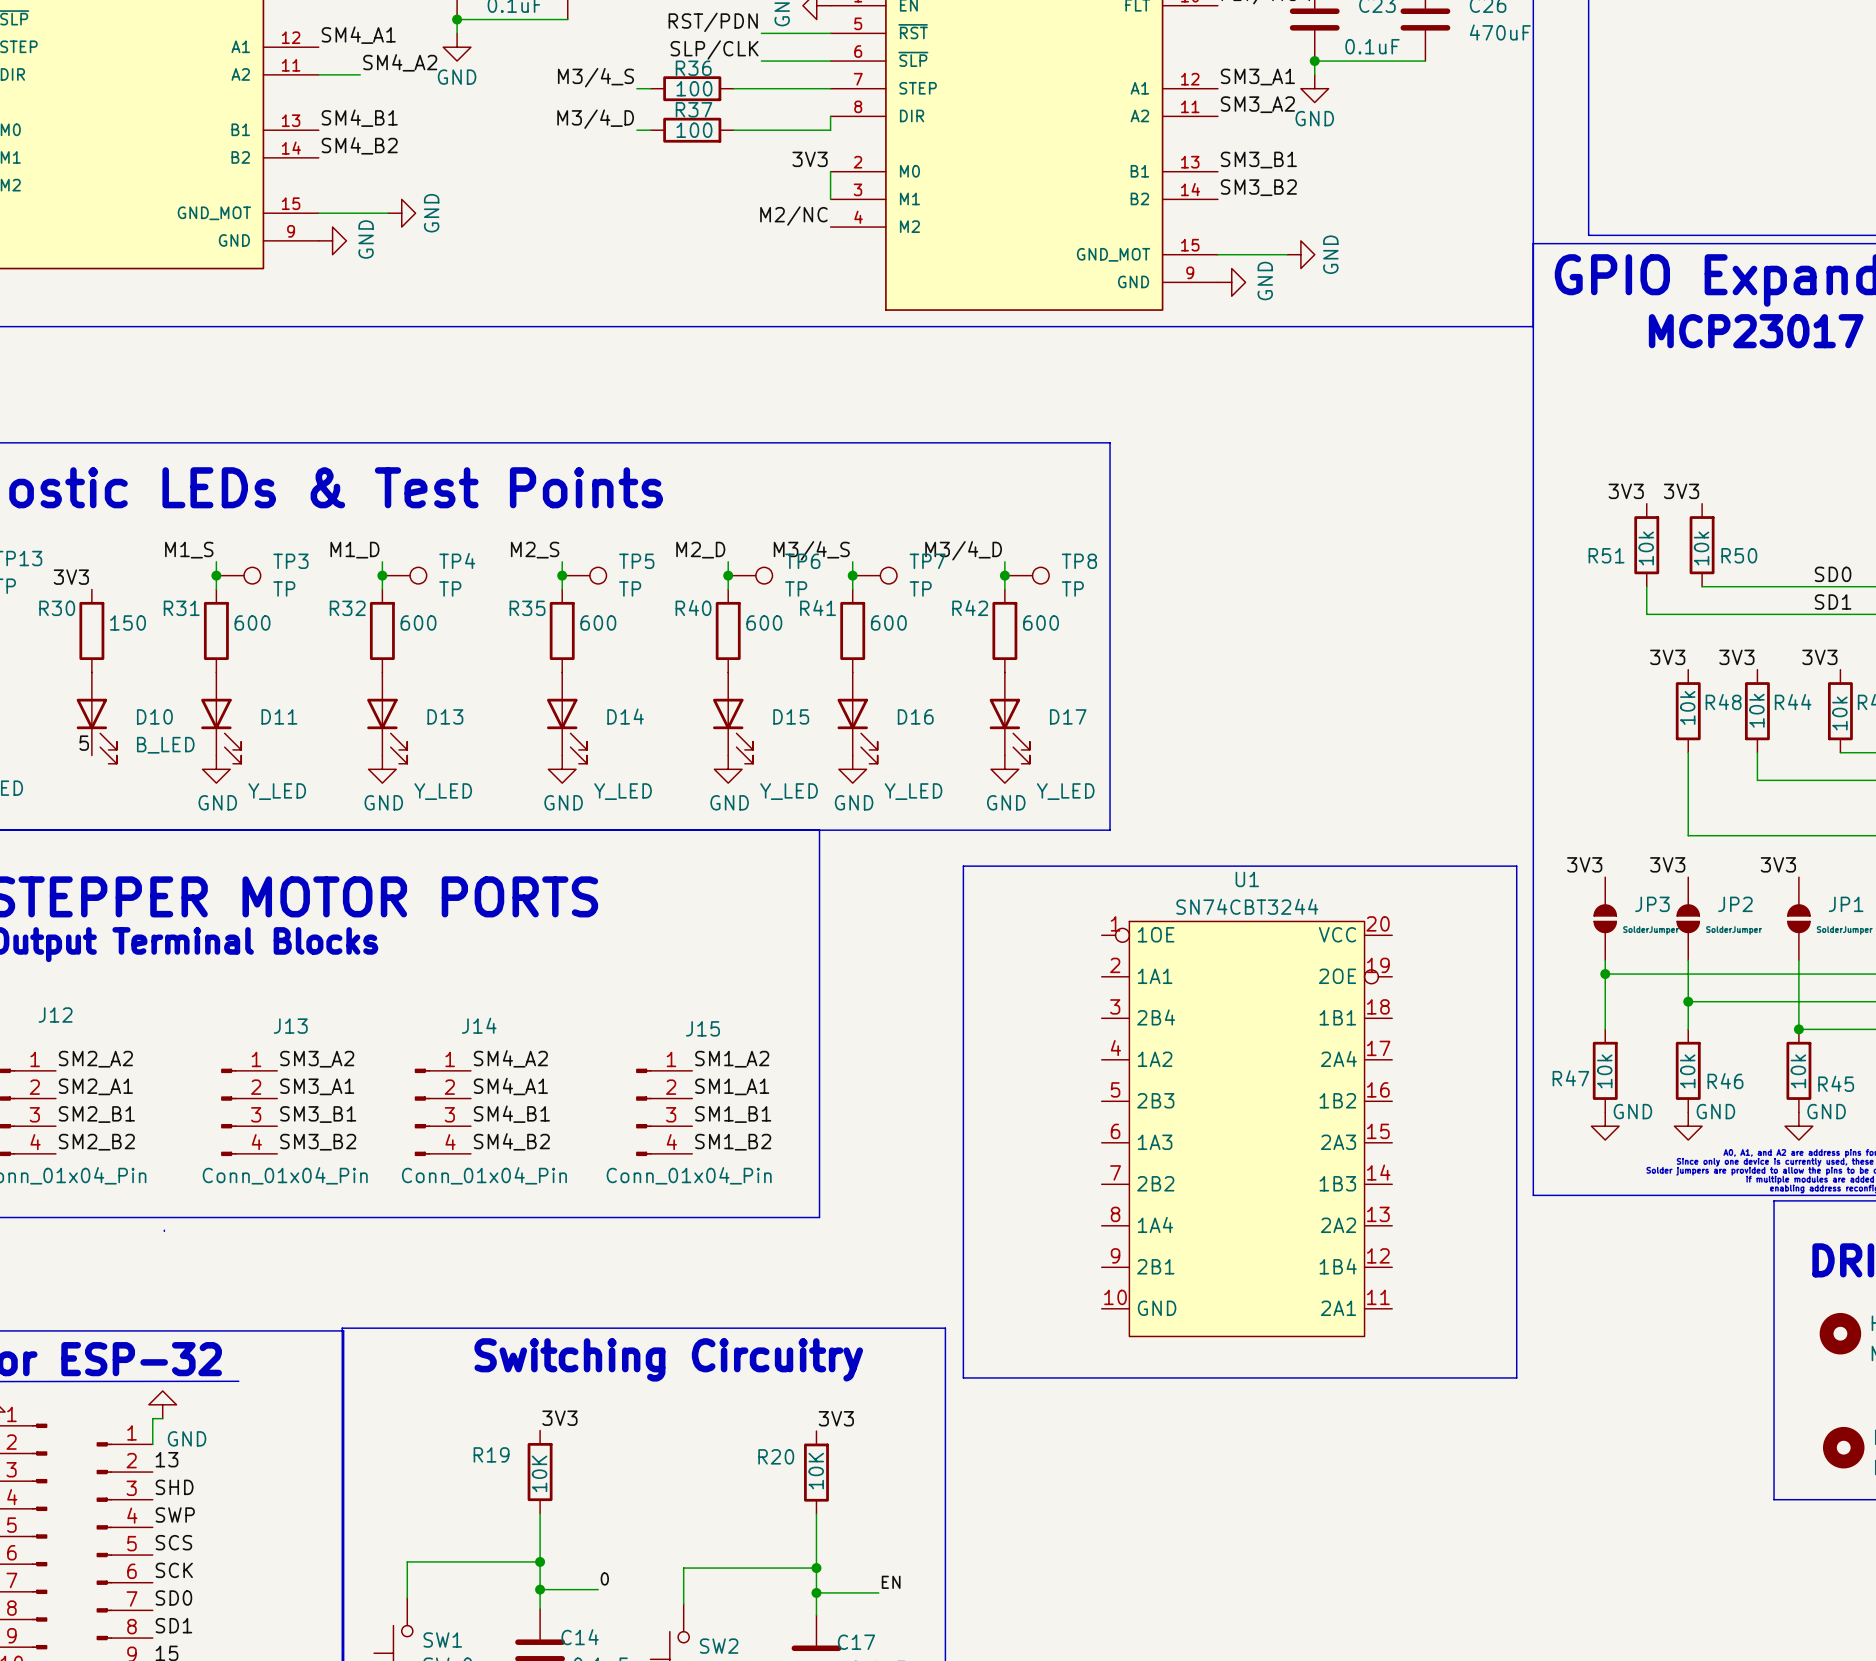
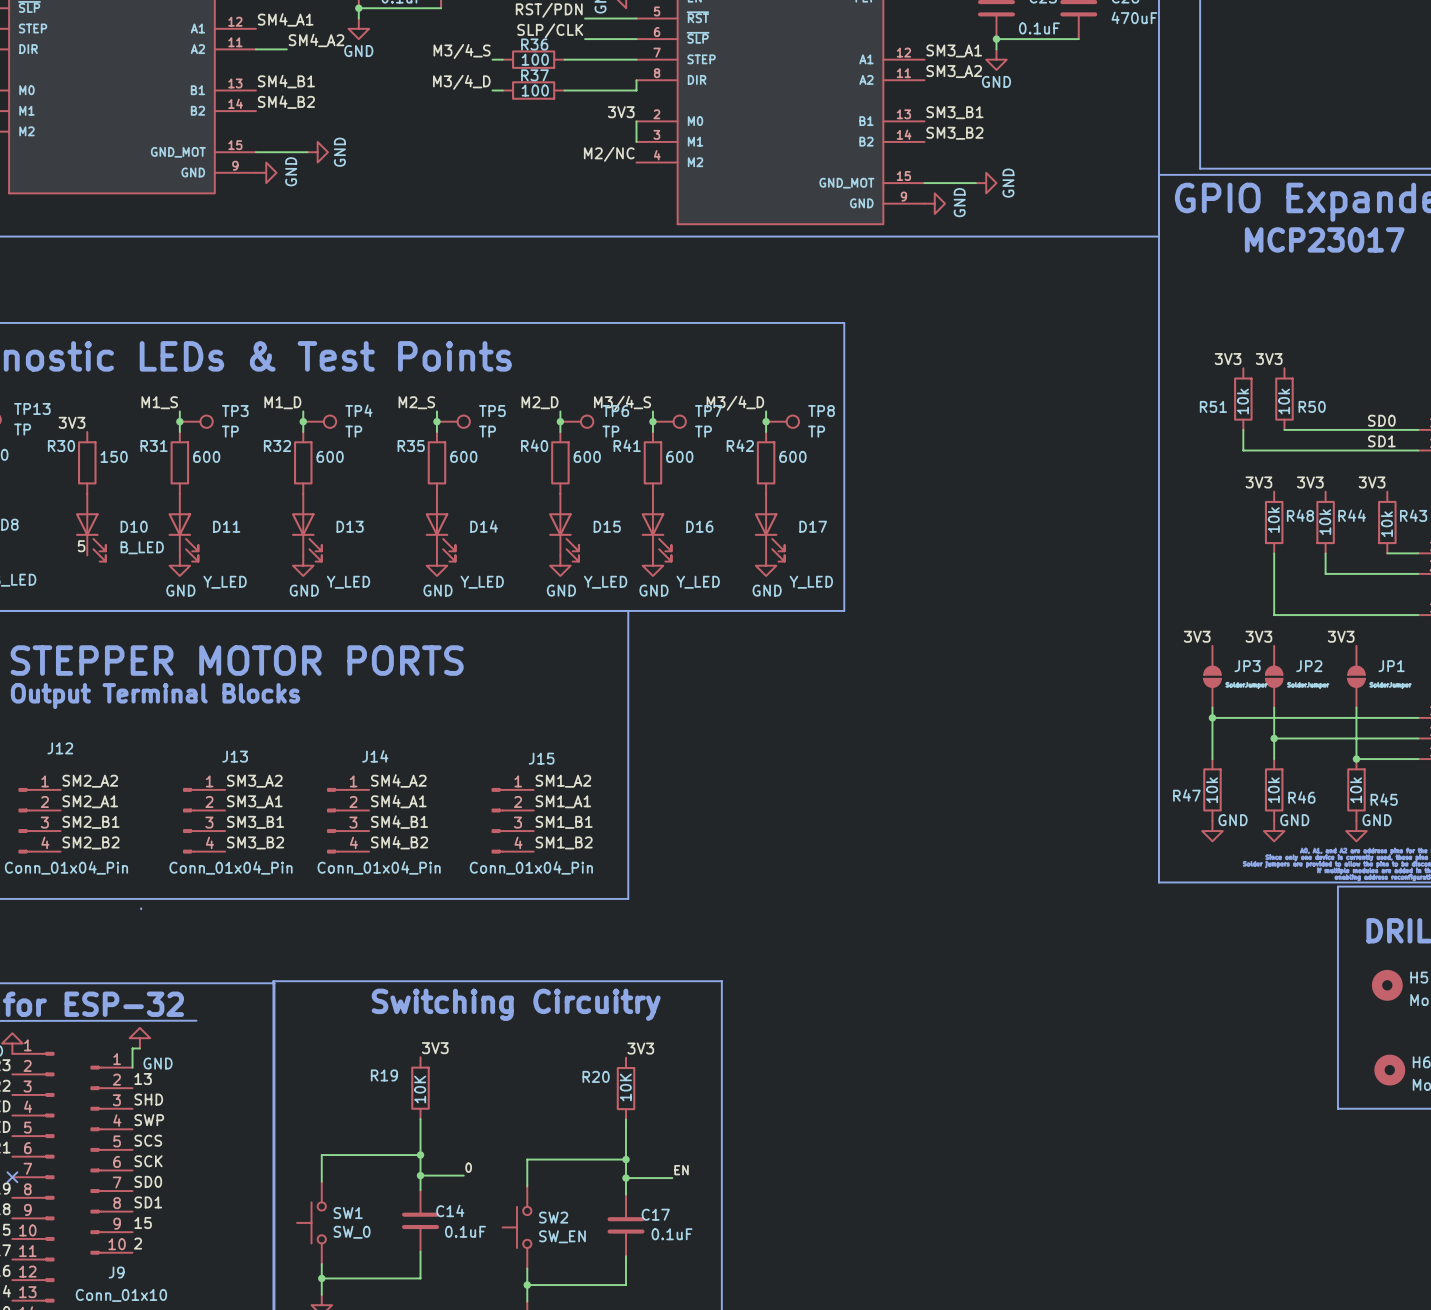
line: (963, 866) (1516, 866) (1516, 1377) (963, 1377) (963, 866) -> none
U1: SN74CBT3244 (1246, 1128) -> none

